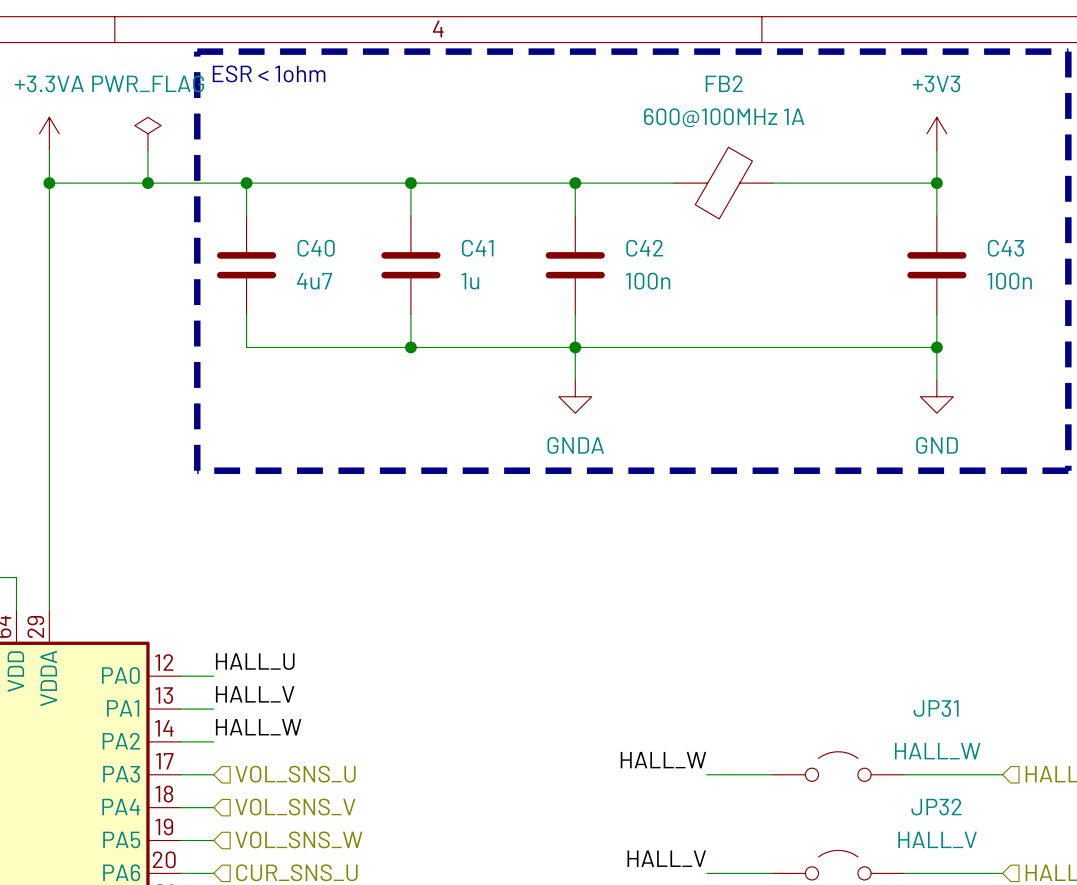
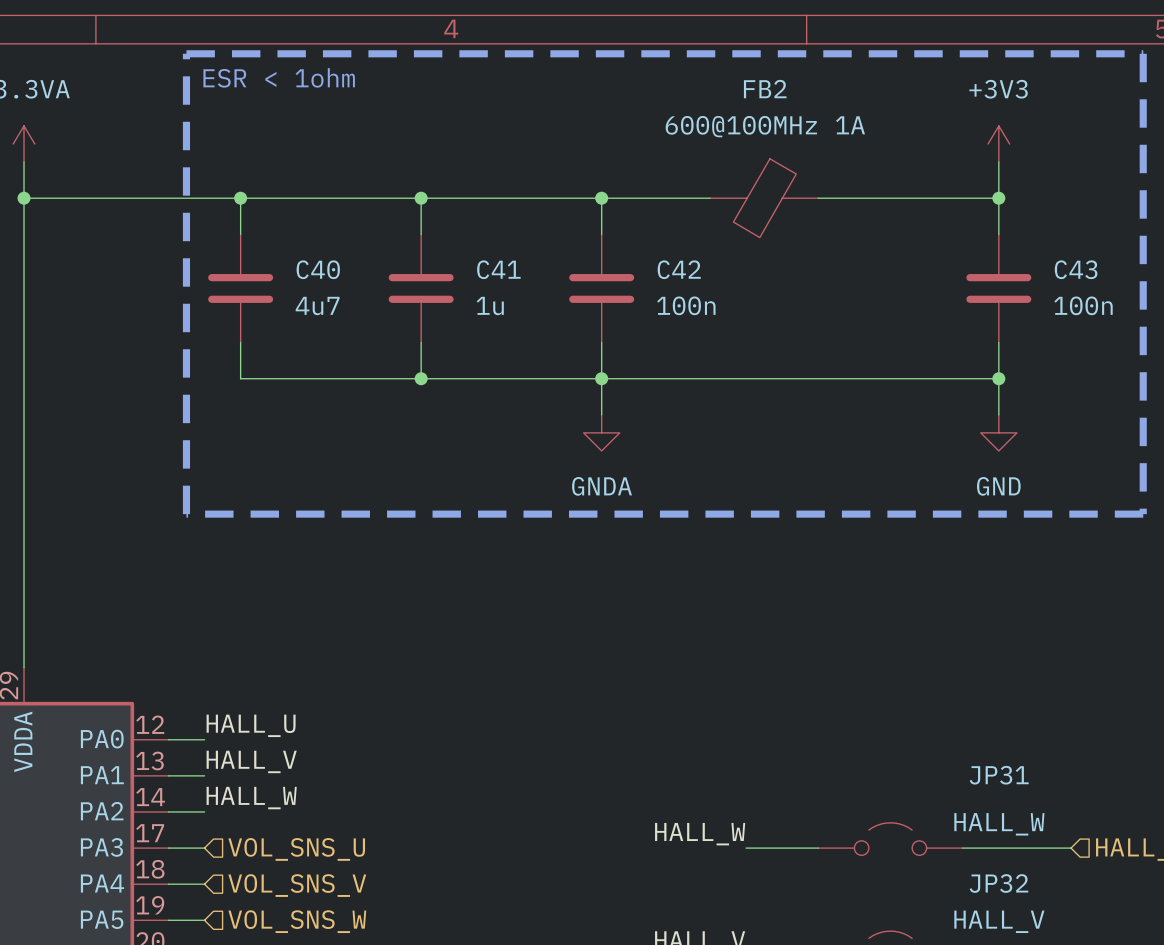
power symbol: PWR_FLAG (147, 133) -> none
wire: (147, 150) (147, 183) -> none
junction: (147, 183) -> none

